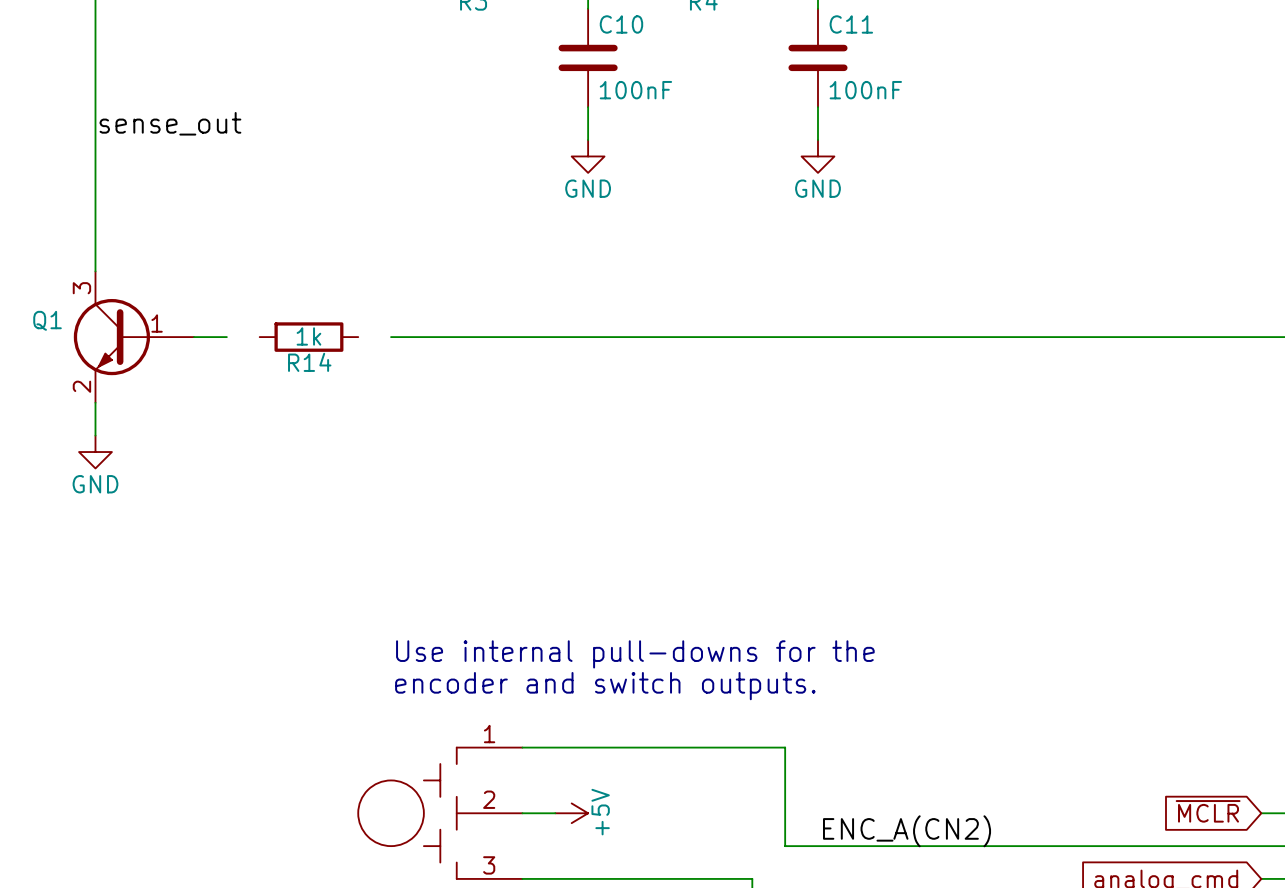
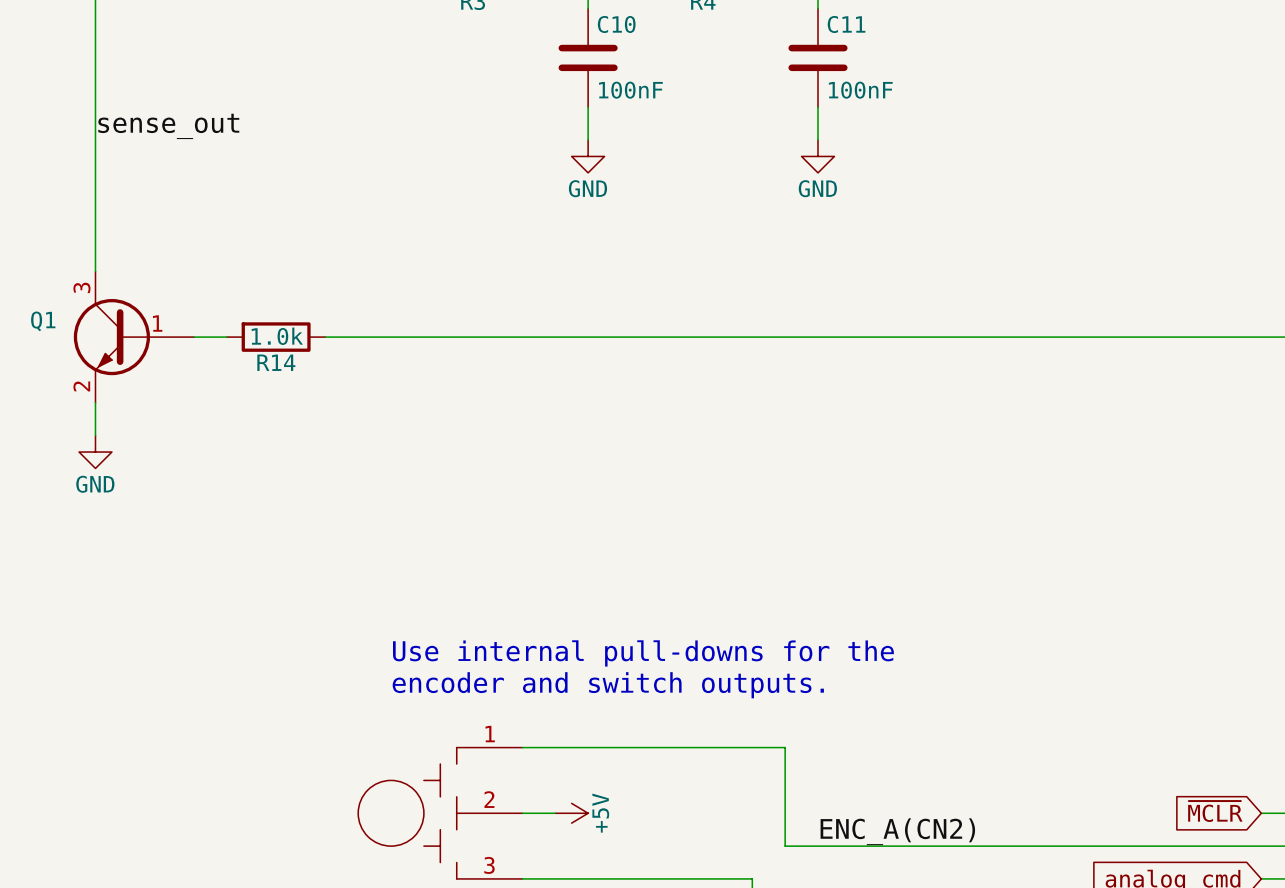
R14 value: 1k (308, 336) -> 1.0k (277, 336)
R14 position: (308, 337) -> (276, 337)
wire: none -> (325, 337) (391, 337)

